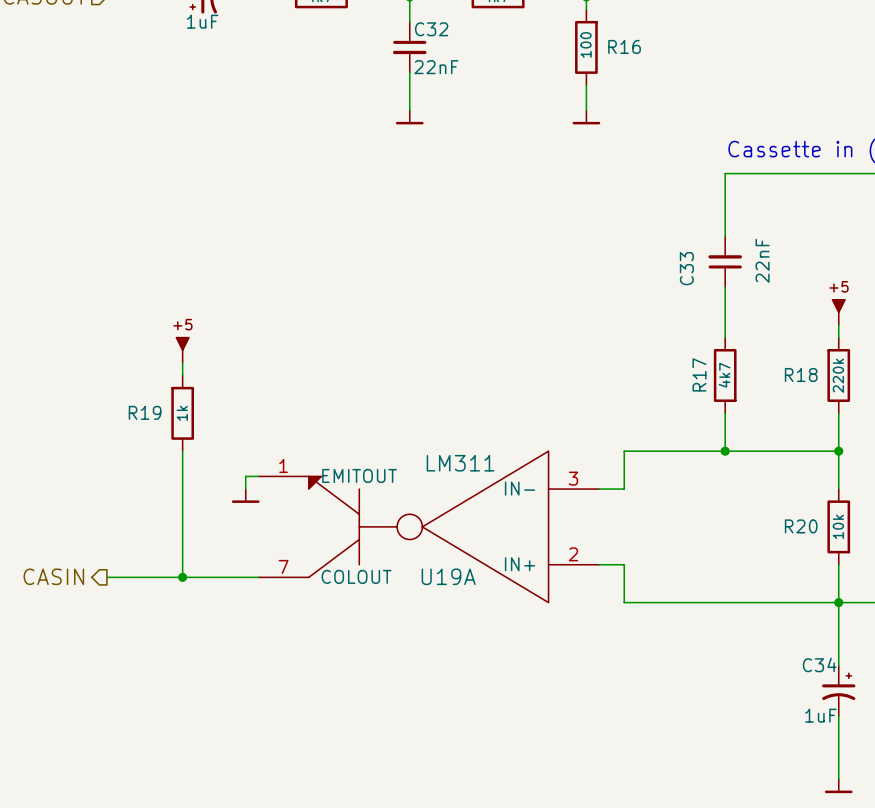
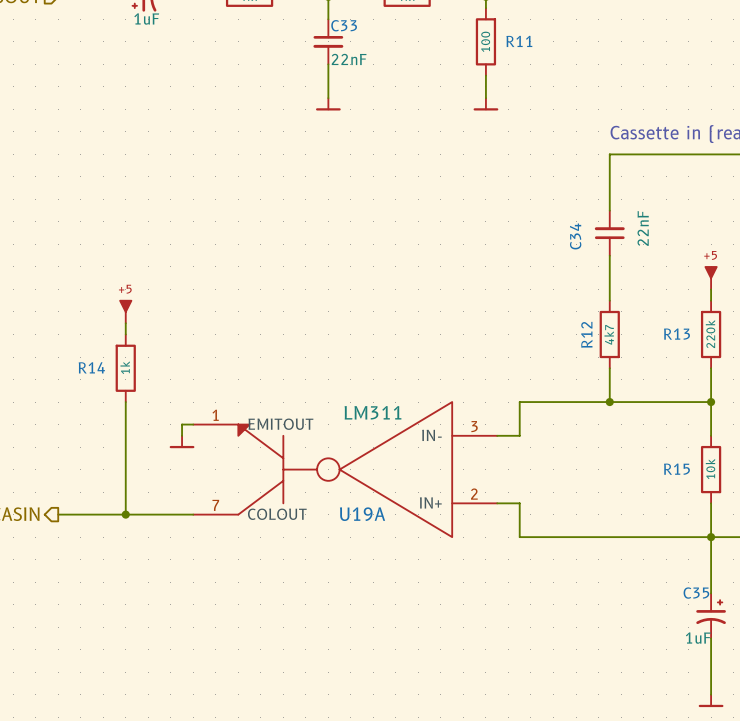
C32 name: C32 (431, 29) -> C33 (344, 25)
R16 name: R16 (624, 46) -> R11 (519, 41)
C33 name: C33 (686, 268) -> C34 (575, 236)
R17 name: R17 (699, 374) -> R12 (586, 334)
R18 name: R18 (801, 375) -> R13 (676, 334)
R19 name: R19 (145, 412) -> R14 (91, 367)
R20 name: R20 (801, 526) -> R15 (676, 469)
C34 name: C34 (819, 664) -> C35 (696, 593)

